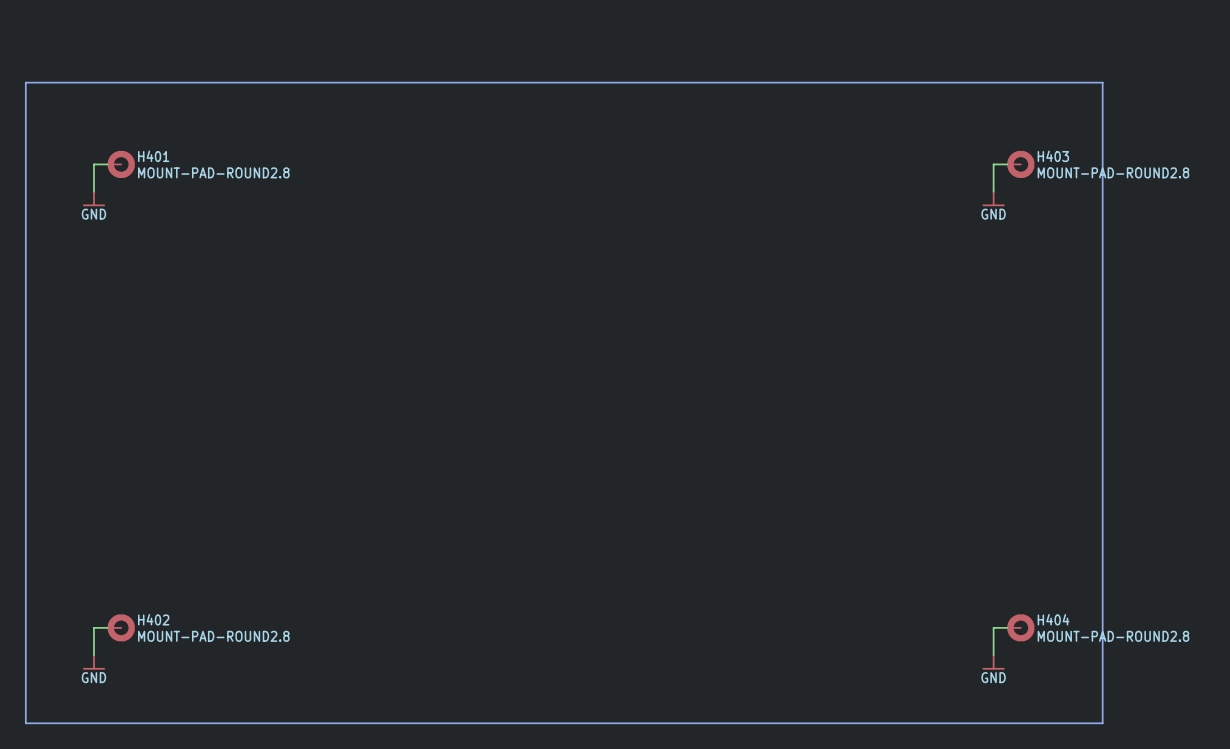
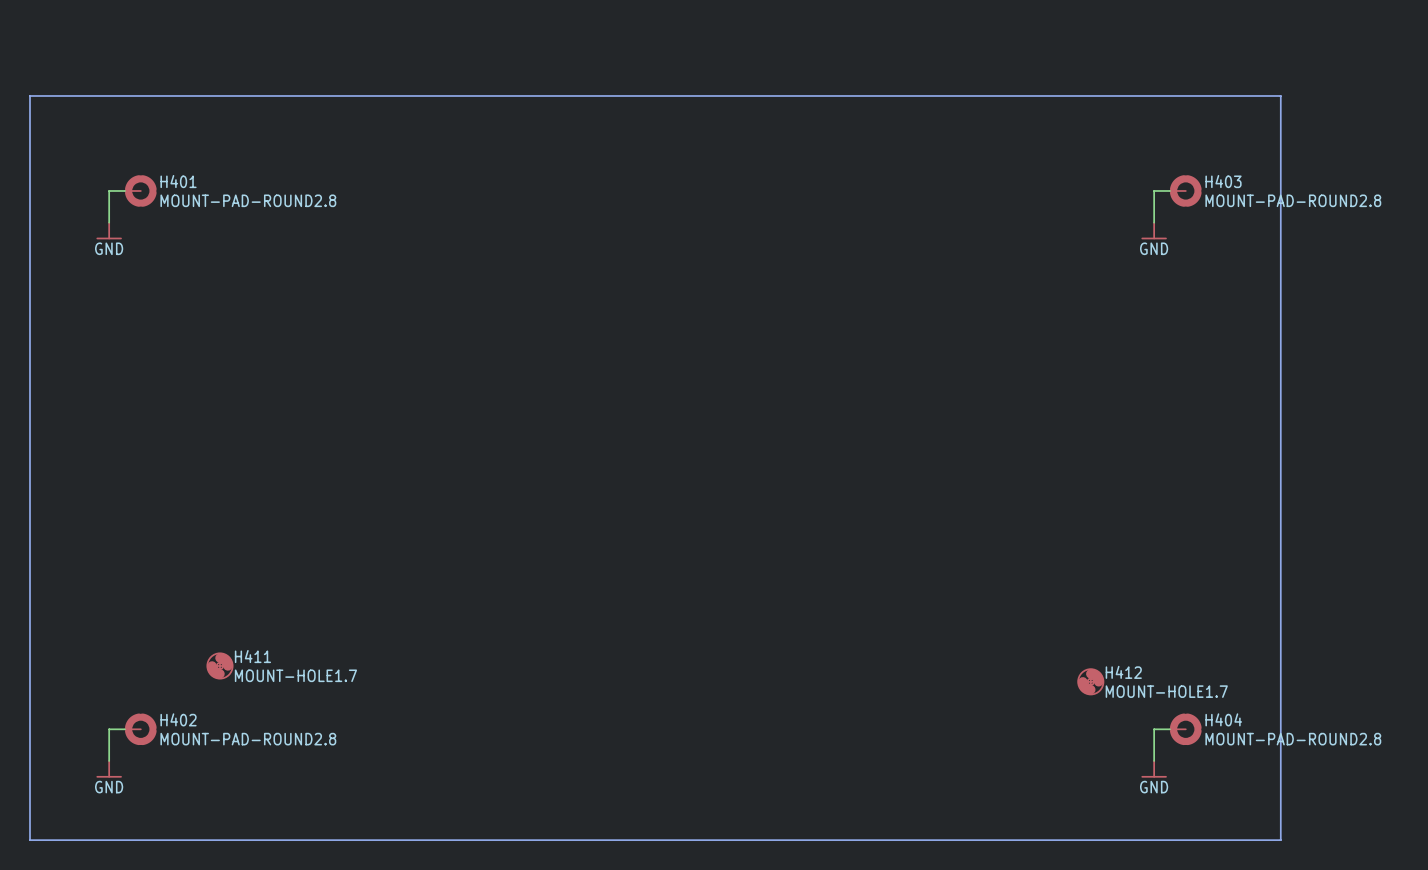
H411: none -> MOUNT-HOLE1.7 (219, 665)
H412: none -> MOUNT-HOLE1.7 (1090, 681)

